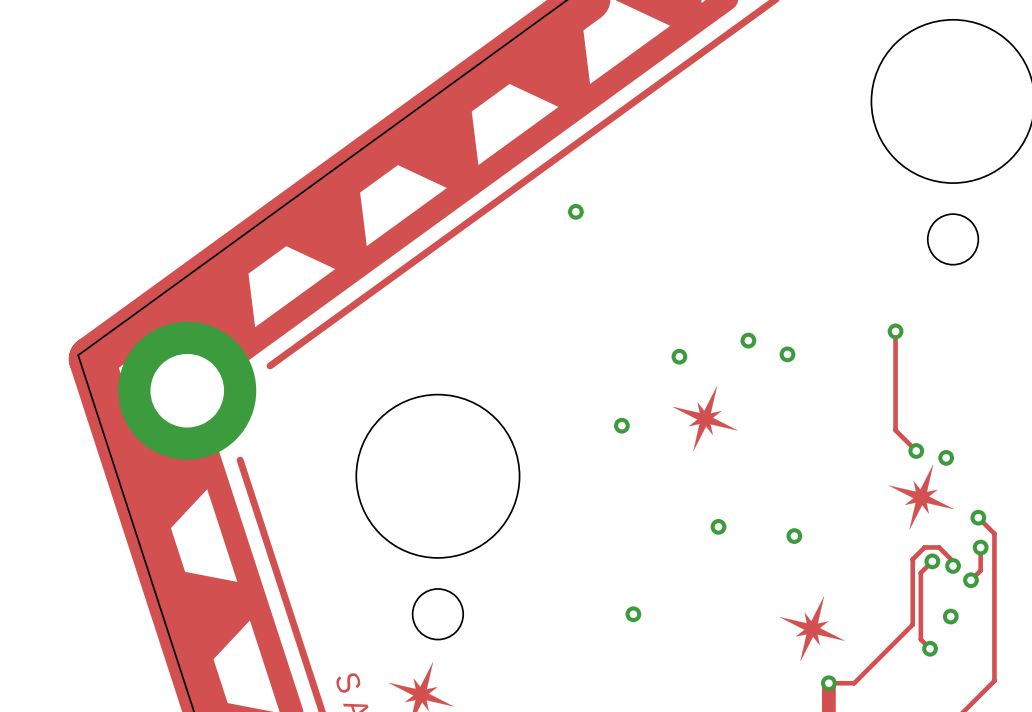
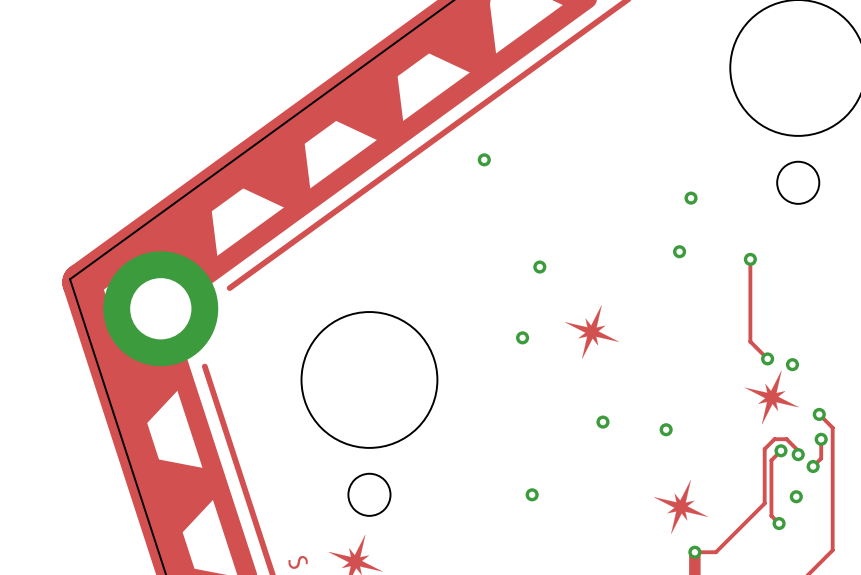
via: none -> (691, 198)
via: none -> (679, 251)
via: (748, 340) -> none
via: (787, 354) -> none
via position: (679, 356) -> (539, 267)

